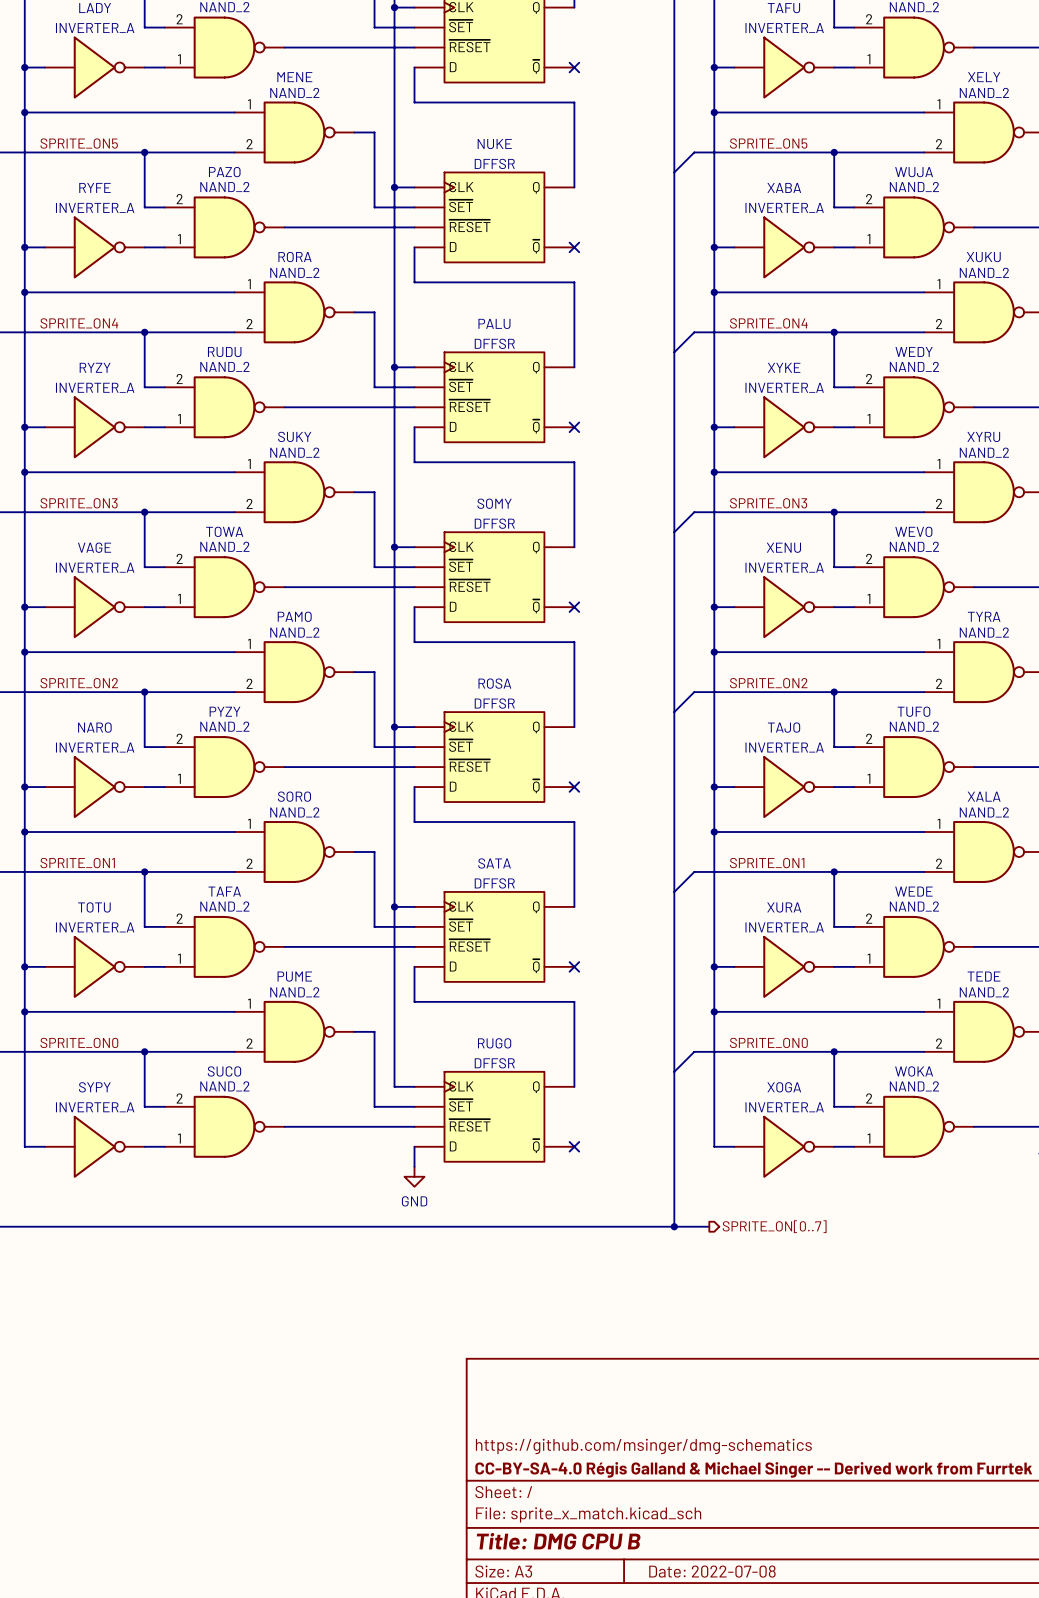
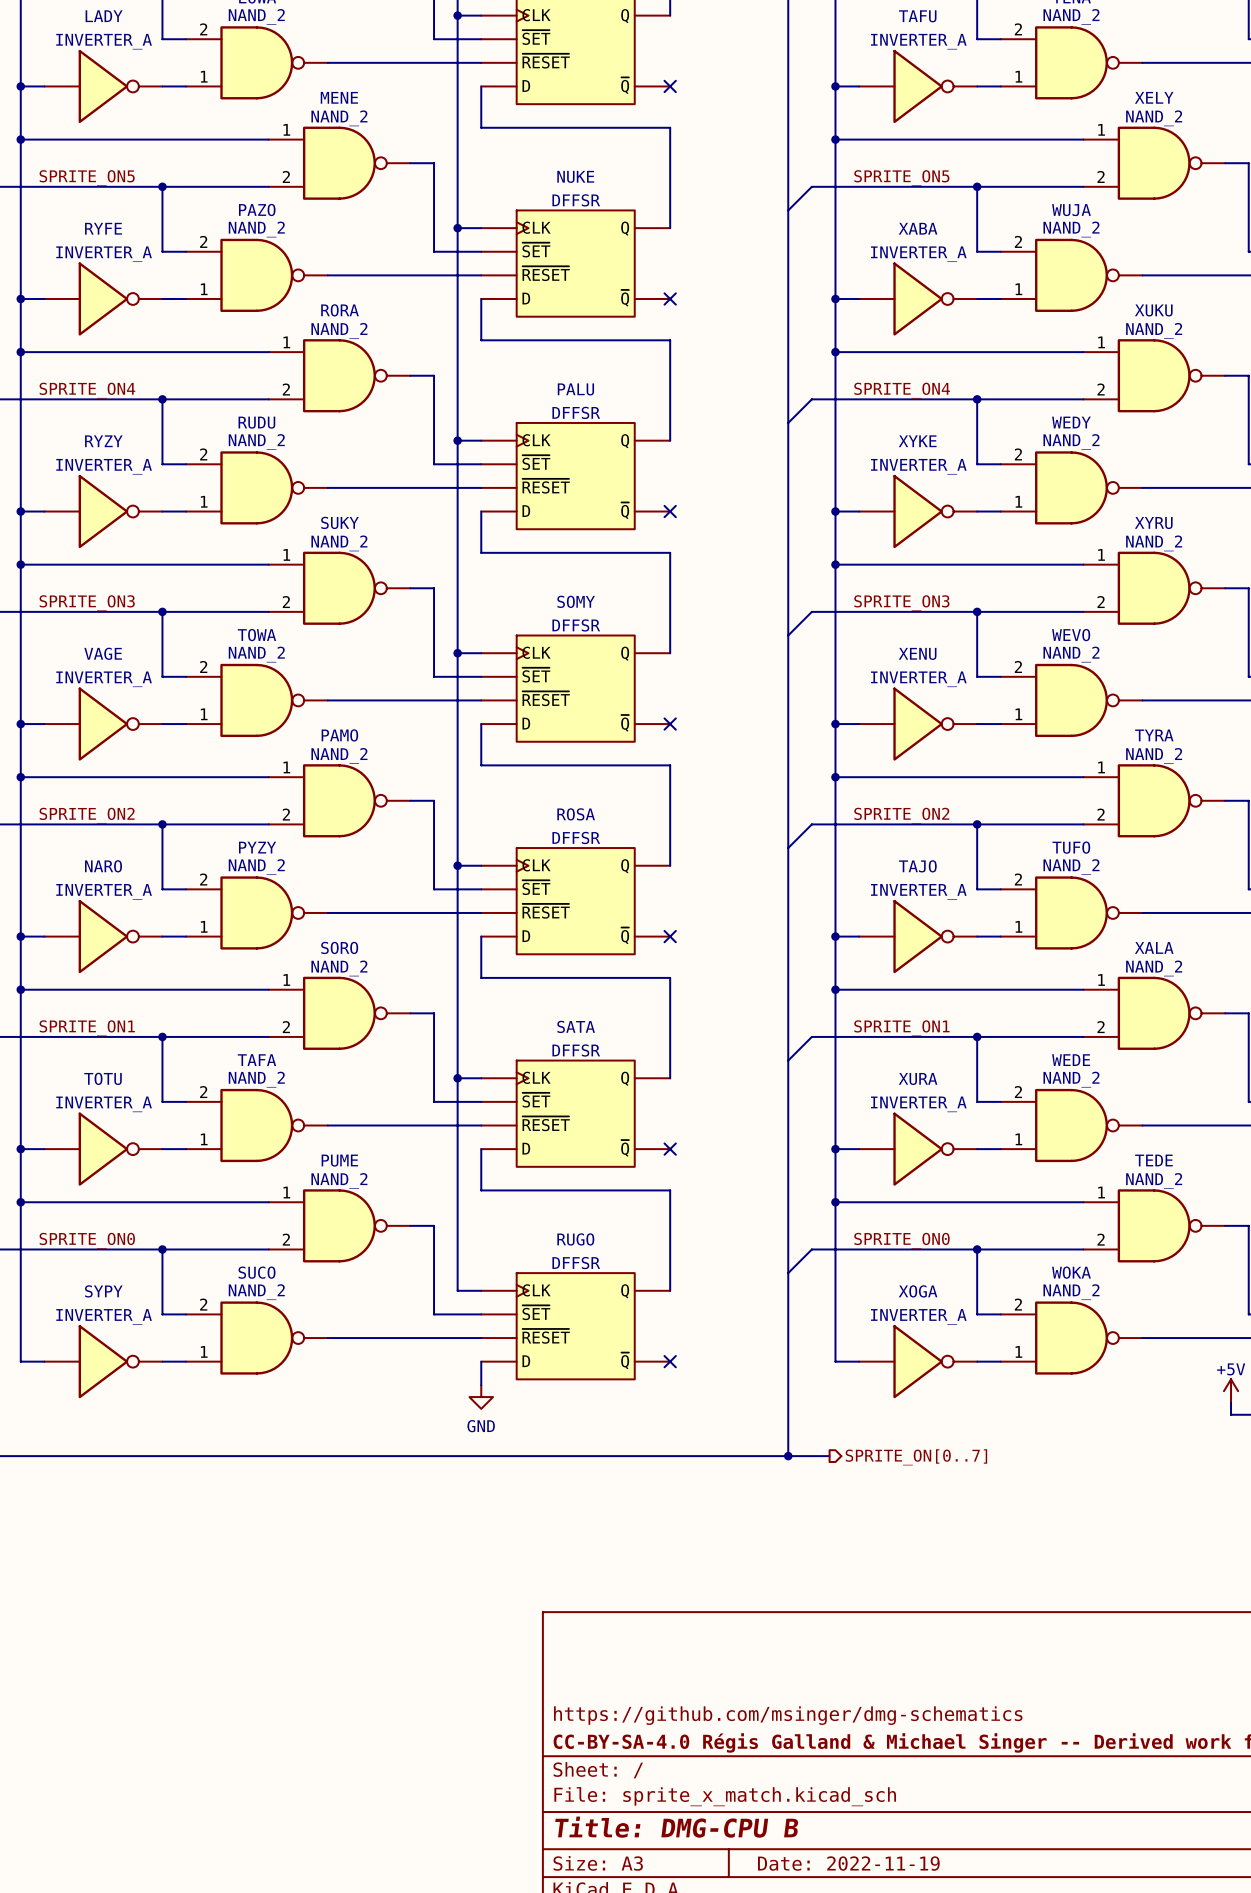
title block: Title: DMG CPU B (558, 1541) -> Title: DMG-CPU B (676, 1827)
title block: Date: 2022-07-08 (712, 1571) -> Date: 2022-11-19 (848, 1863)

